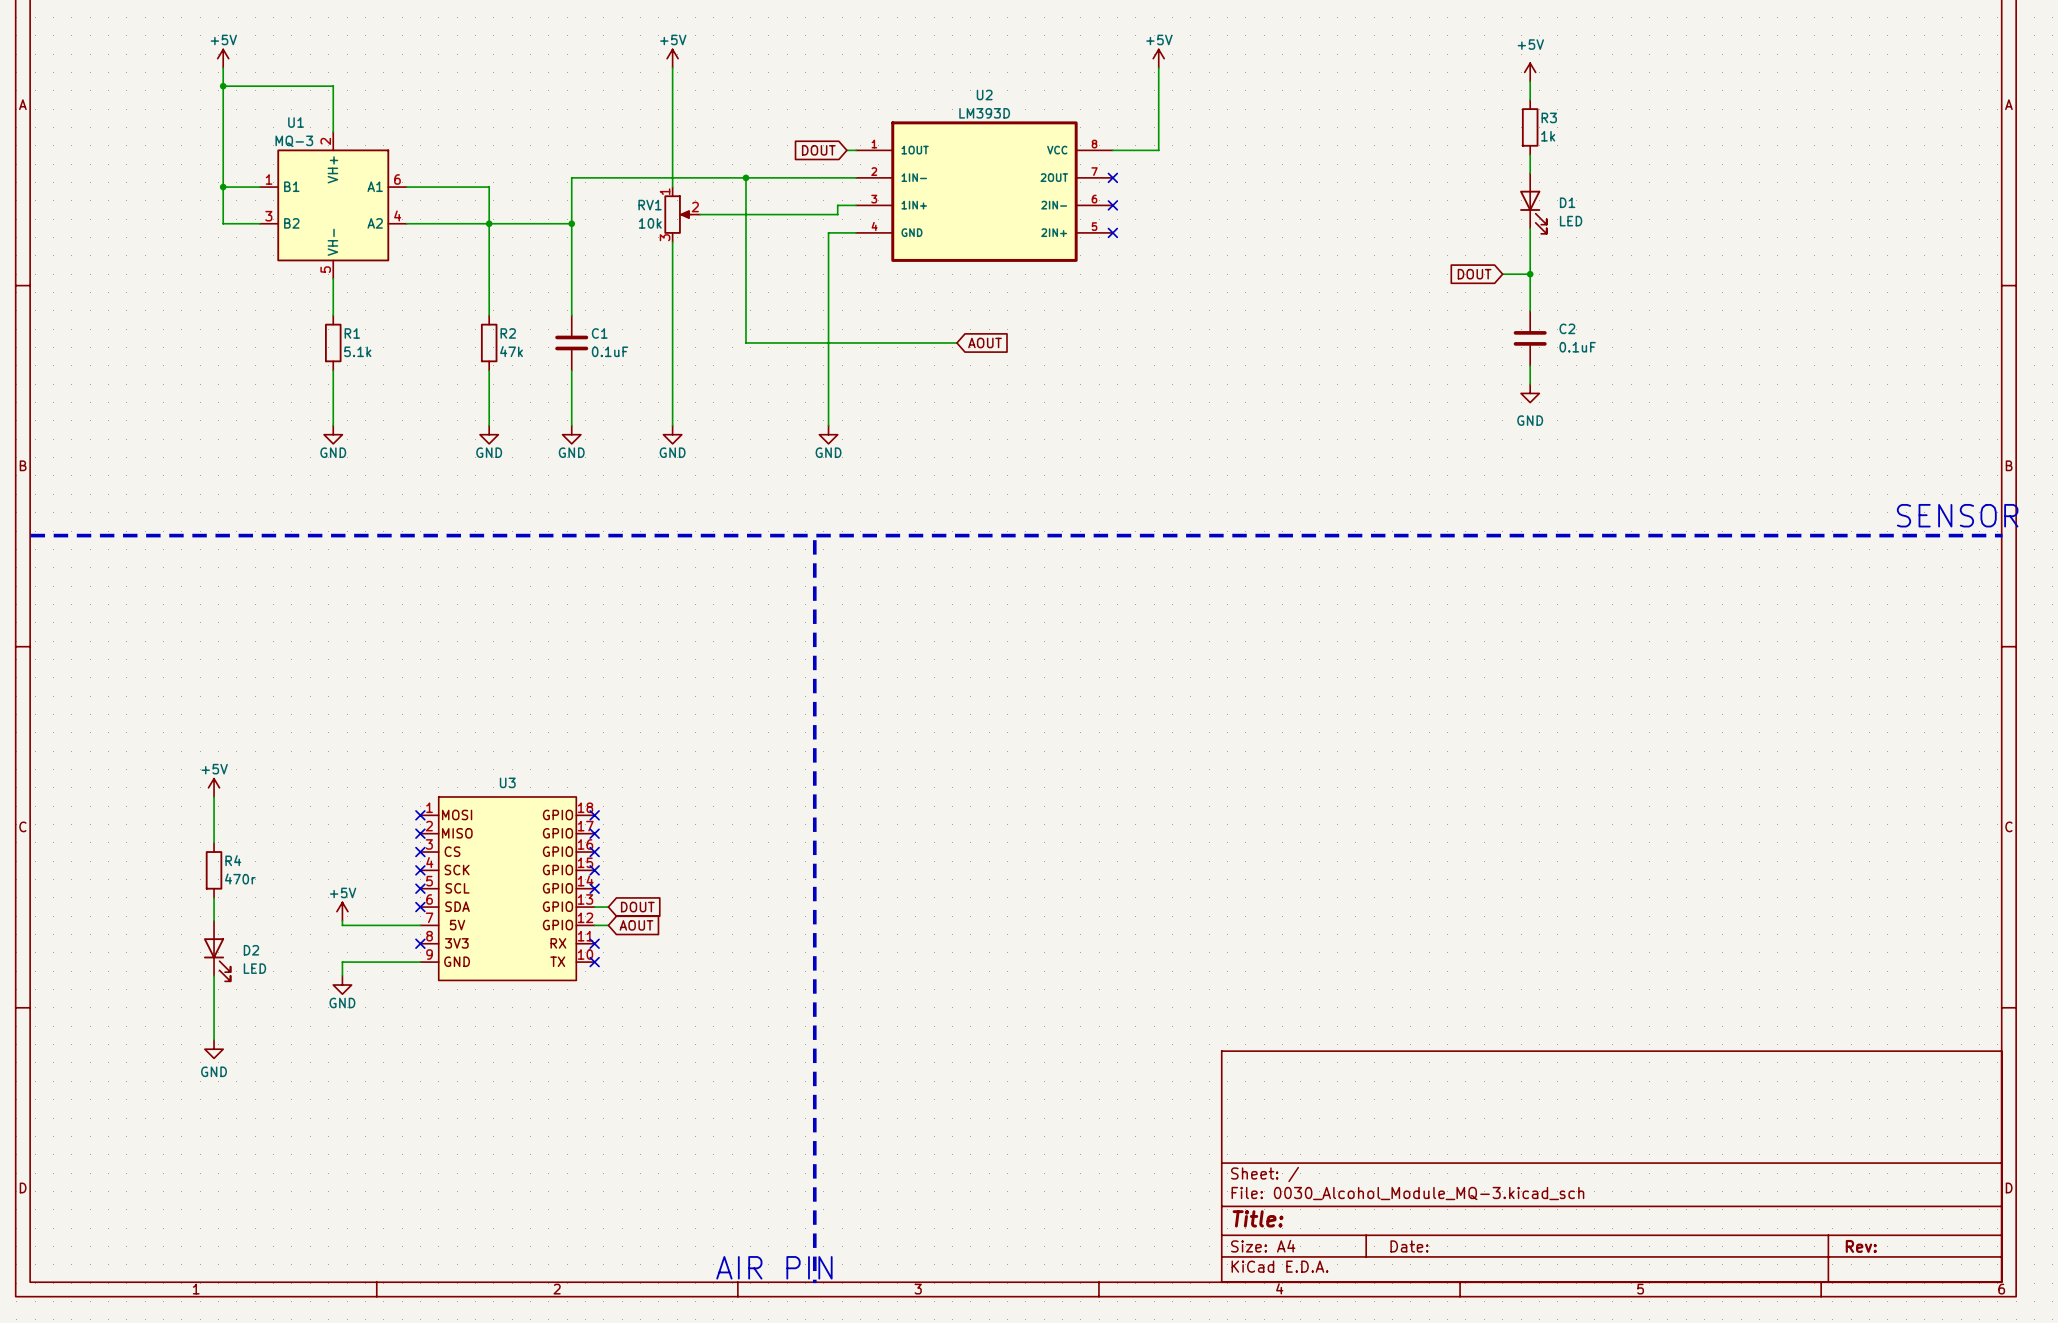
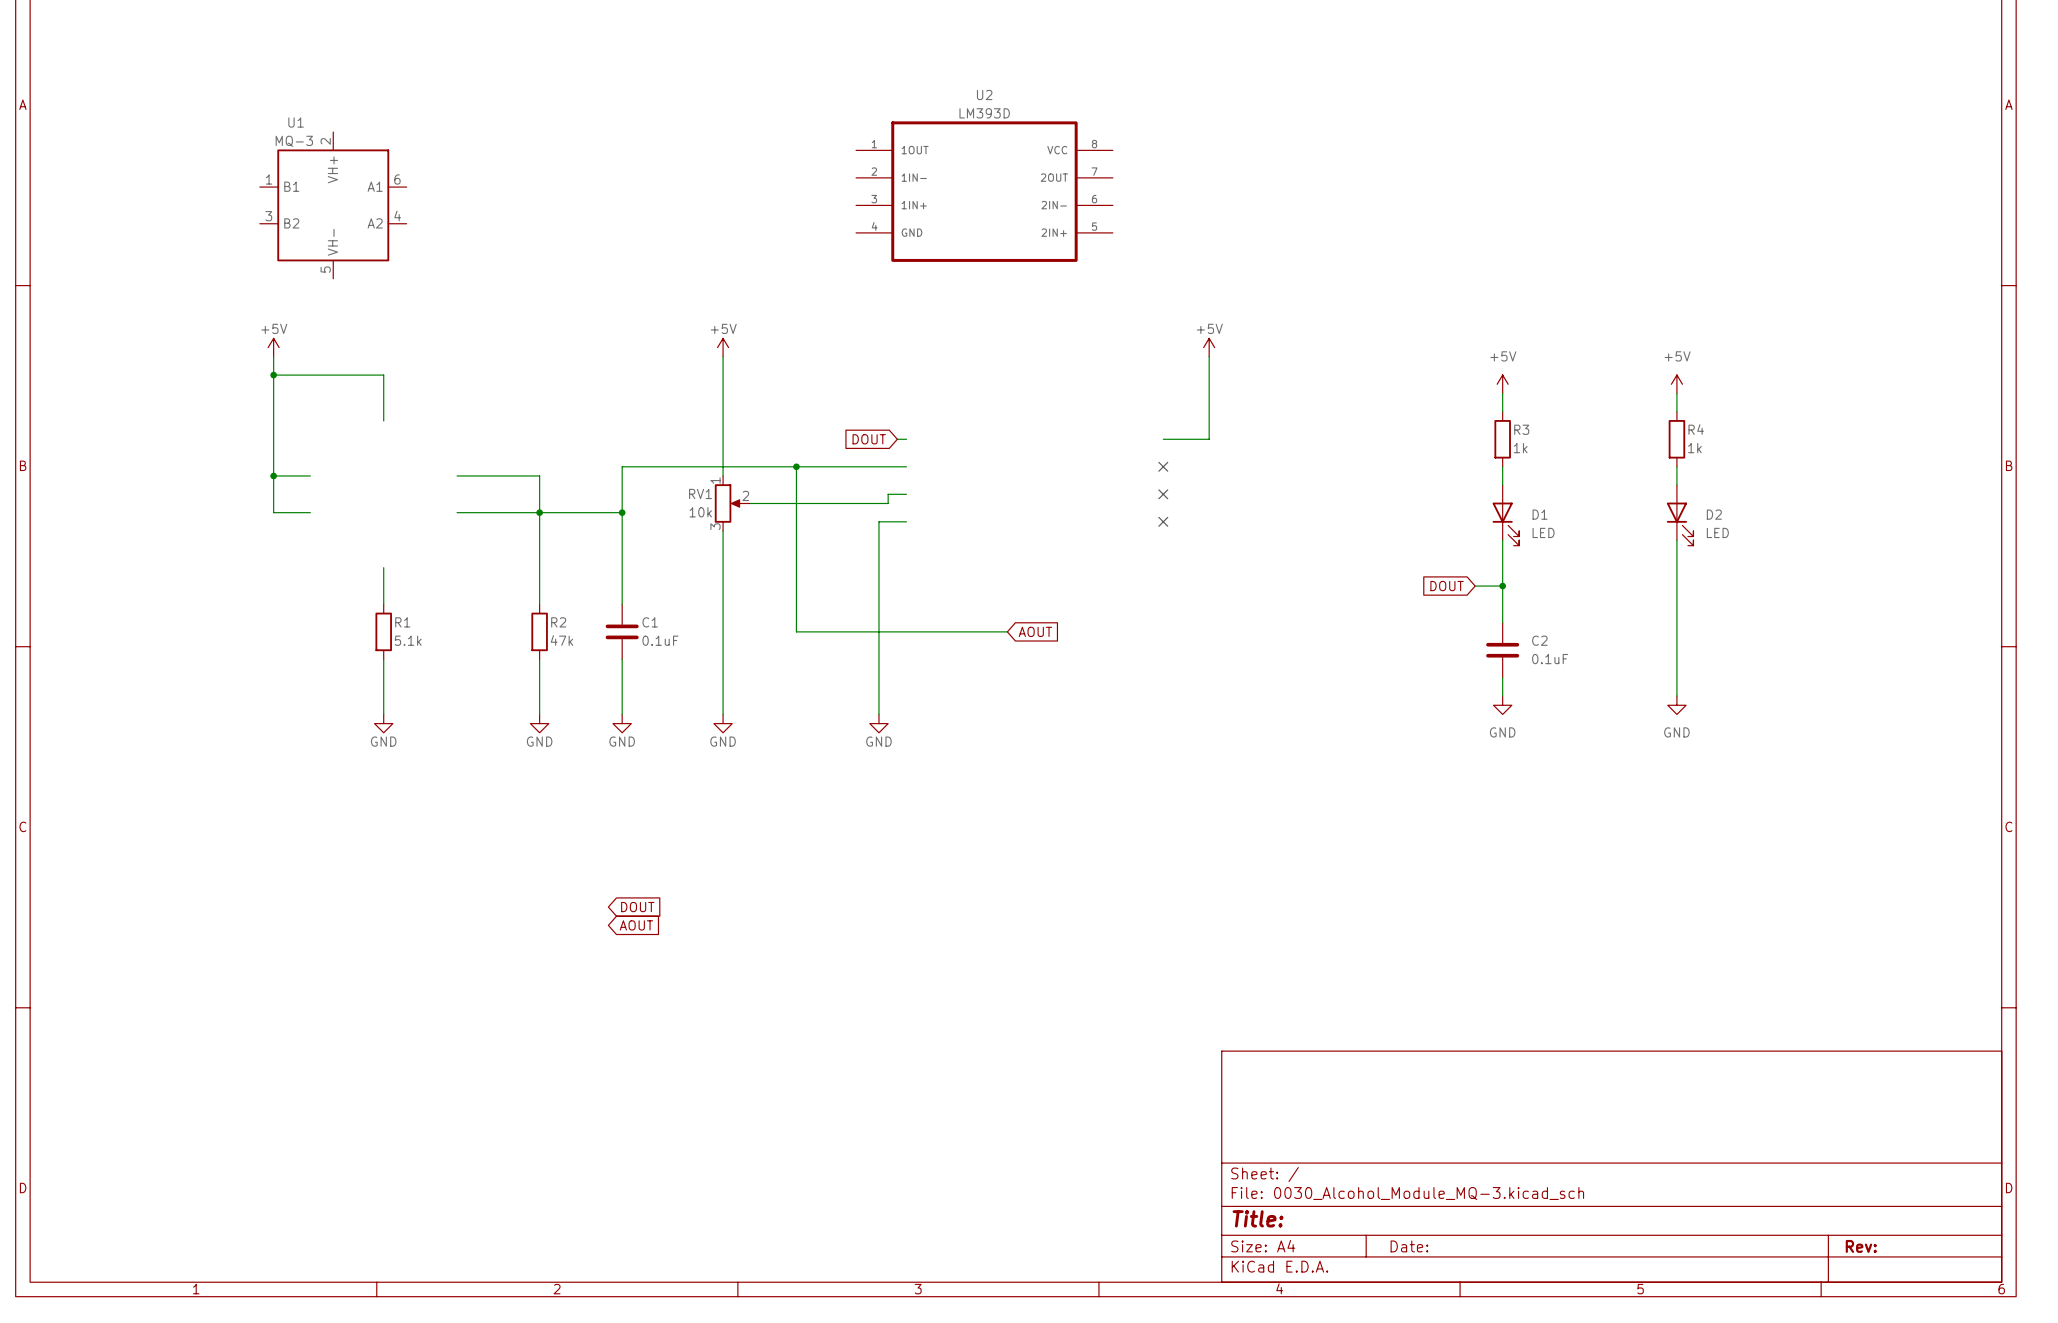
power symbol: +5V (223, 58) -> none
power symbol: +5V (672, 58) -> none
power symbol: +5V (1158, 58) -> none
wire: (223, 67) (223, 223) (259, 223) -> none
wire: (672, 67) (672, 187) -> none
wire: (1158, 67) (1158, 150) (1112, 150) -> none
power symbol: +5V (1530, 72) -> none
wire: (1530, 81) (1530, 99) -> none
wire: (223, 86) (333, 86) (333, 132) -> none
junction: (223, 86) -> none
R3 position: (1530, 127) -> (1502, 439)
global label: DOUT (818, 150) -> none
wire: (846, 150) (856, 150) -> none
wire: (1530, 154) (1530, 173) -> none
wire: (745, 177) (745, 342) (956, 342) -> none
junction: (745, 177) -> none
wire: (856, 177) (571, 177) (571, 315) -> none
no-connect mark: (1112, 177) -> none
wire: (223, 187) (259, 187) -> none
junction: (223, 187) -> none
wire: (406, 187) (489, 187) (489, 315) -> none
D1 position: (1533, 203) -> (1505, 515)
wire: (856, 205) (837, 205) (837, 214) (700, 214) -> none
no-connect mark: (1112, 205) -> none
RV1 position: (682, 214) -> (732, 503)
wire: (406, 223) (571, 223) -> none
junction: (489, 223) -> none
junction: (571, 223) -> none
wire: (1530, 228) (1530, 310) -> none
wire: (856, 232) (828, 232) (828, 425) -> none
no-connect mark: (1112, 232) -> none
wire: (672, 242) (672, 425) -> none
global label: DOUT (1474, 274) -> none
wire: (1502, 274) (1530, 274) -> none
junction: (1530, 274) -> none
wire: (333, 278) (333, 315) -> none
C2 position: (1530, 338) -> (1502, 650)
R1 position: (333, 342) -> (383, 631)
R2 position: (489, 342) -> (539, 631)
C1 position: (571, 342) -> (622, 631)
global label: AOUT (985, 342) -> none
power symbol: none -> +5V (273, 347)
power symbol: none -> +5V (723, 347)
power symbol: none -> +5V (1209, 347)
wire: none -> (273, 356) (273, 512) (310, 512)
wire: none -> (723, 356) (723, 475)
wire: none -> (1209, 356) (1209, 439) (1163, 439)
wire: (1530, 365) (1530, 384) -> (1502, 393) (1502, 411)
wire: (333, 370) (333, 425) -> none
wire: (489, 370) (489, 425) -> none
wire: (571, 370) (571, 425) -> none
wire: none -> (273, 375) (383, 375) (383, 420)
junction: none -> (273, 375)
power symbol: none -> +5V (1502, 384)
power symbol: none -> +5V (1676, 384)
power symbol: GND (1530, 393) -> none
wire: none -> (1676, 393) (1676, 411)
power symbol: GND (333, 434) -> none
power symbol: GND (489, 434) -> none
power symbol: GND (571, 434) -> none
power symbol: GND (672, 434) -> none
power symbol: GND (828, 434) -> none
global label: none -> DOUT (869, 439)
wire: none -> (897, 439) (906, 439)
wire: none -> (796, 466) (796, 631) (1007, 631)
junction: none -> (796, 466)
wire: none -> (906, 466) (622, 466) (622, 604)
no-connect mark: none -> (1163, 466)
wire: none -> (1502, 466) (1502, 485)
wire: none -> (1676, 466) (1676, 485)
wire: none -> (273, 475) (310, 475)
junction: none -> (273, 475)
wire: none -> (457, 475) (539, 475) (539, 604)
wire: none -> (906, 494) (888, 494) (888, 503) (750, 503)
no-connect mark: none -> (1163, 494)
wire: none -> (457, 512) (622, 512)
junction: none -> (539, 512)
junction: none -> (622, 512)
text: SENSOR (1957, 515) -> none
wire: none -> (906, 521) (878, 521) (878, 714)
no-connect mark: none -> (1163, 521)
wire: none -> (723, 531) (723, 714)
line: (30, 535) (2002, 535) -> none
line: (814, 540) (814, 1283) -> none
wire: none -> (1502, 540) (1502, 622)
wire: none -> (1676, 540) (1676, 696)
wire: none -> (383, 567) (383, 604)
global label: none -> DOUT (1447, 586)
wire: none -> (1475, 586) (1502, 586)
junction: none -> (1502, 586)
global label: none -> AOUT (1035, 631)
wire: none -> (383, 659) (383, 714)
wire: none -> (539, 659) (539, 714)
wire: none -> (622, 659) (622, 714)
wire: none -> (1502, 677) (1502, 696)
power symbol: none -> GND (1502, 705)
power symbol: none -> GND (1676, 705)
power symbol: none -> GND (383, 723)
power symbol: none -> GND (539, 723)
power symbol: none -> GND (622, 723)
power symbol: none -> GND (723, 723)
power symbol: none -> GND (878, 723)
power symbol: +5V (214, 787) -> none
wire: (214, 796) (214, 842) -> none
no-connect mark: (420, 815) -> none
no-connect mark: (594, 815) -> none
no-connect mark: (420, 833) -> none
no-connect mark: (594, 833) -> none
no-connect mark: (420, 852) -> none
no-connect mark: (594, 852) -> none
R4 position: (214, 870) -> (1676, 439)
no-connect mark: (420, 870) -> none
no-connect mark: (594, 870) -> none
R4 value: 470r (240, 878) -> 1k (1694, 448)
no-connect mark: (420, 888) -> none
U3: (507, 888) -> none
no-connect mark: (594, 888) -> none
wire: (214, 897) (214, 920) -> none
no-connect mark: (420, 907) -> none
wire: (594, 907) (608, 907) -> none
power symbol: +5V (342, 911) -> none
wire: (342, 920) (342, 925) (420, 925) -> none
wire: (594, 925) (608, 925) -> none
no-connect mark: (420, 943) -> none
no-connect mark: (594, 943) -> none
D2 position: (217, 951) -> (1680, 515)
wire: (420, 962) (342, 962) (342, 975) -> none
no-connect mark: (594, 962) -> none
wire: (214, 975) (214, 1040) -> none
power symbol: GND (342, 985) -> none
power symbol: GND (214, 1049) -> none
text: AIR PIN (774, 1267) -> none

